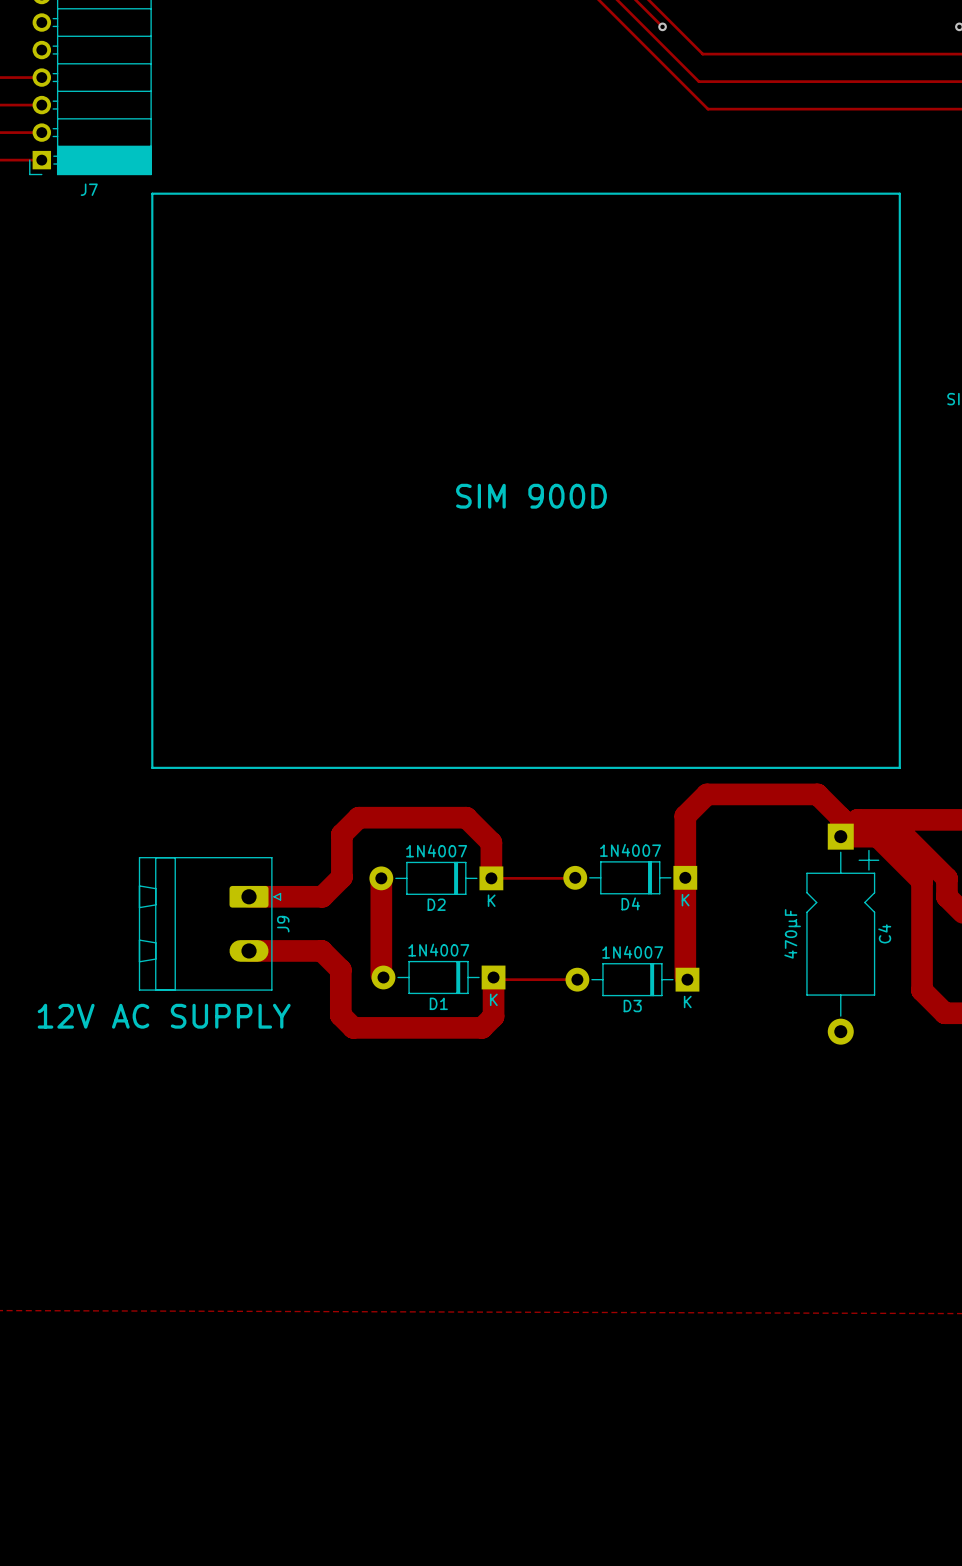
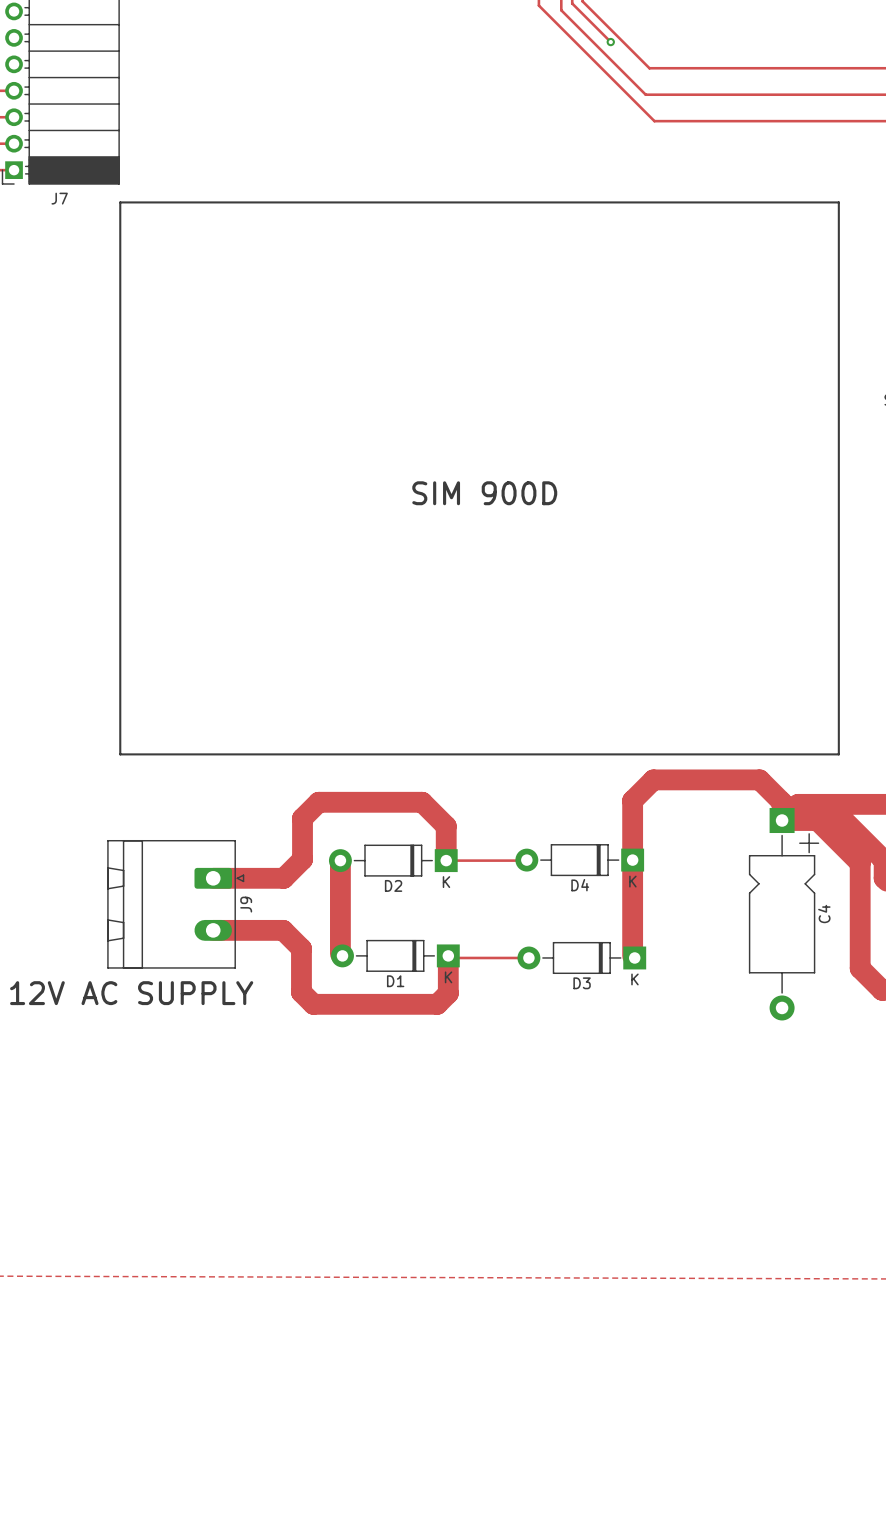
D2 value: 1N4007 (436, 850) -> none
D4 value: 1N4007 (630, 850) -> none
C4 value: 470μF (792, 933) -> none
D1 value: 1N4007 (438, 950) -> none
D3 value: 1N4007 (632, 952) -> none

